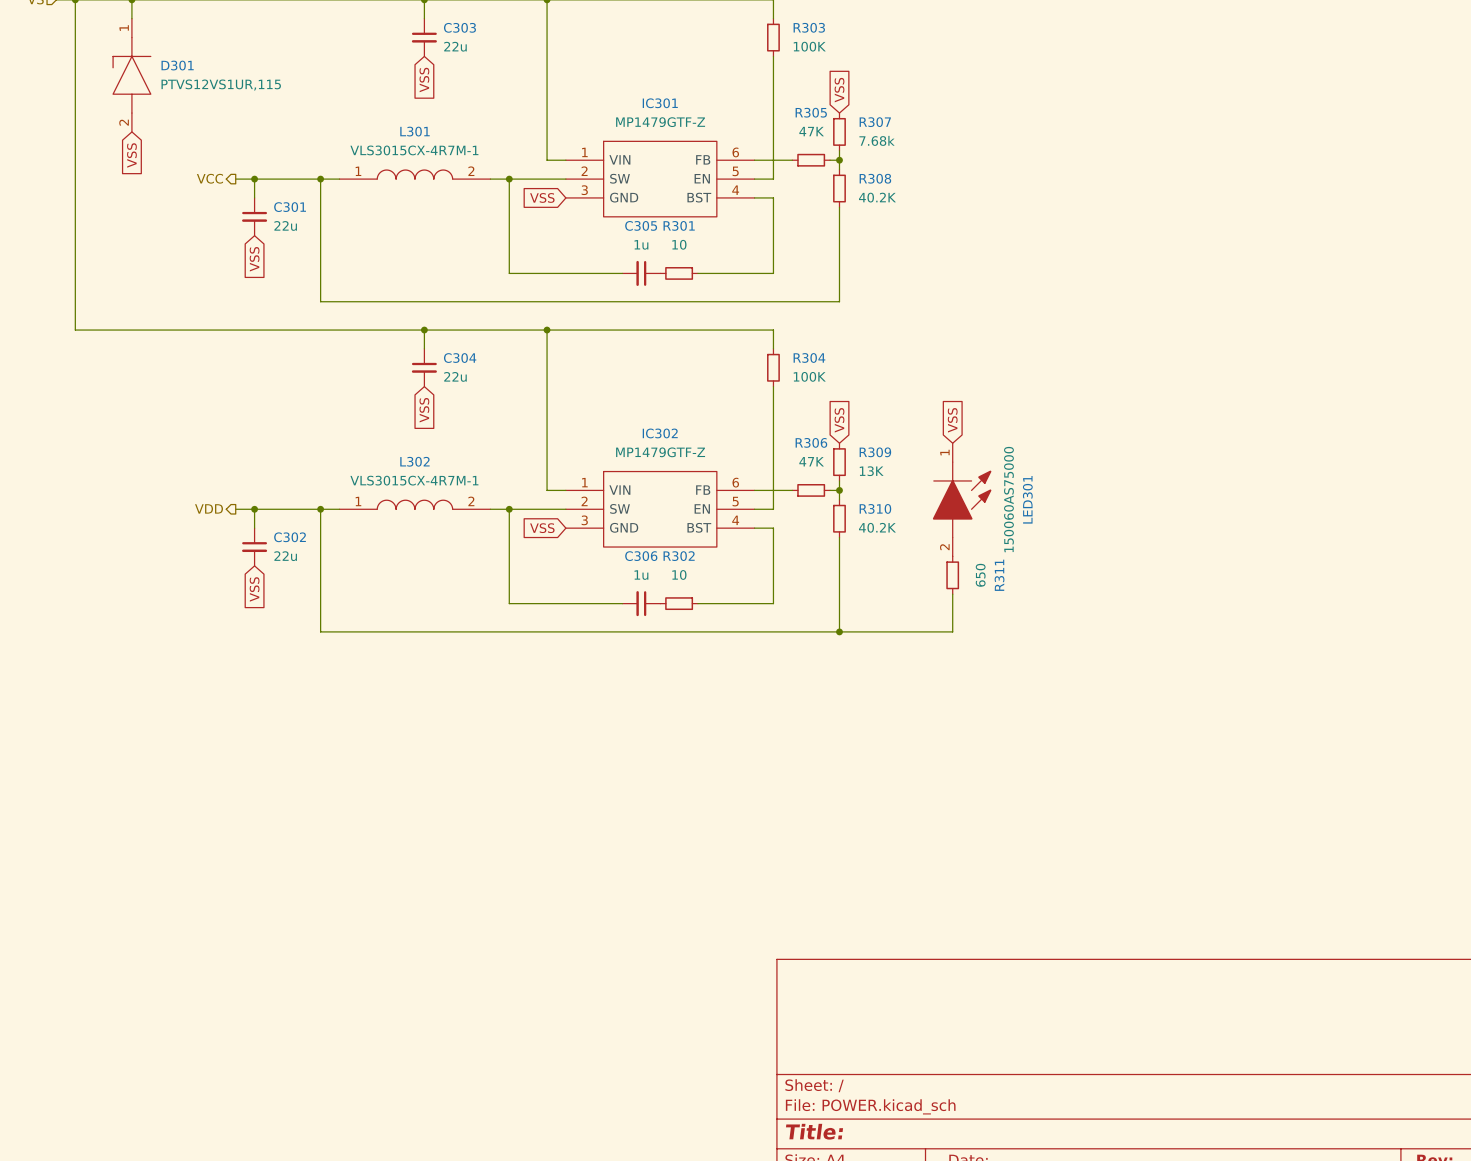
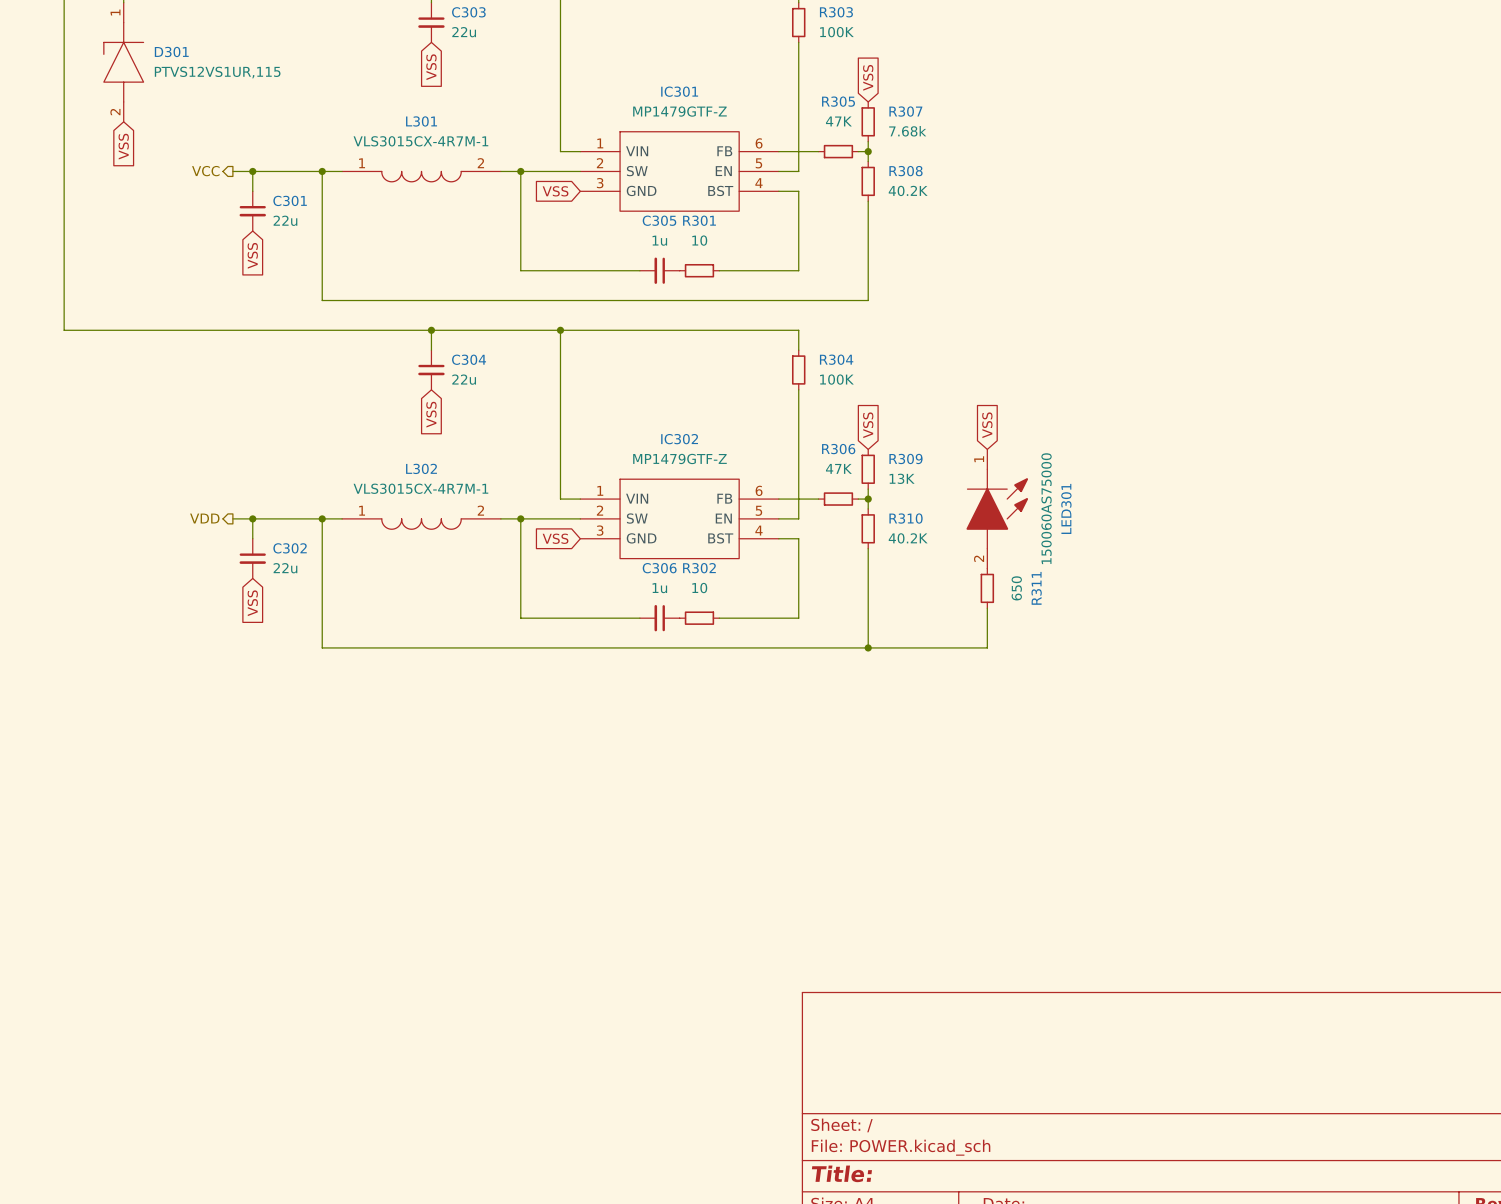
L301 symbol: [339, 169, 491, 180] -> [342, 170, 501, 183]
L302 symbol: [339, 499, 491, 510] -> [342, 518, 501, 530]

